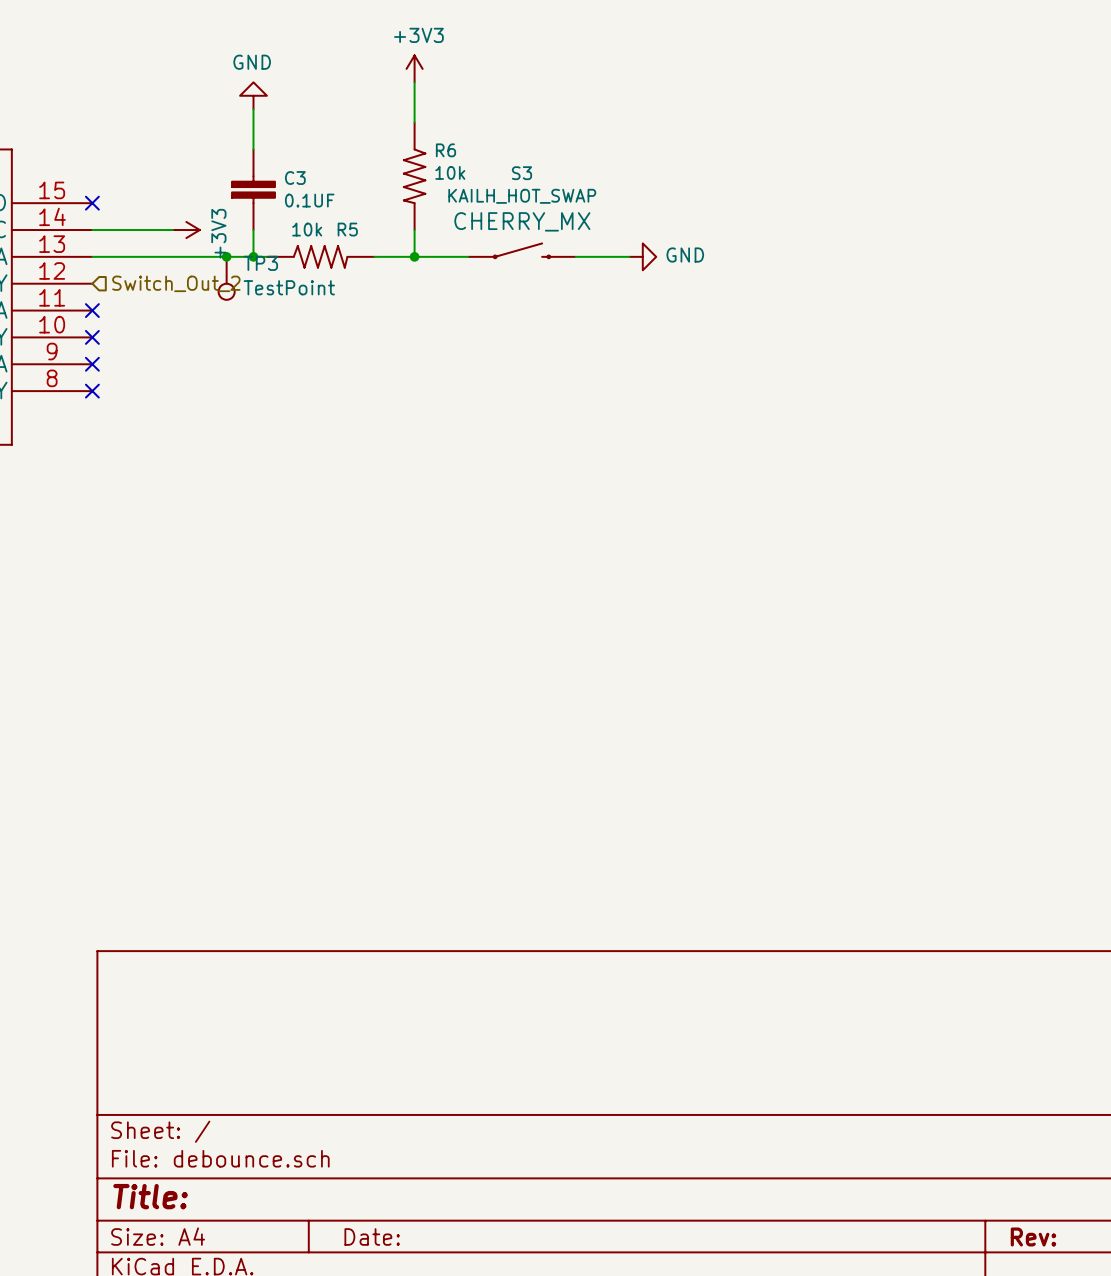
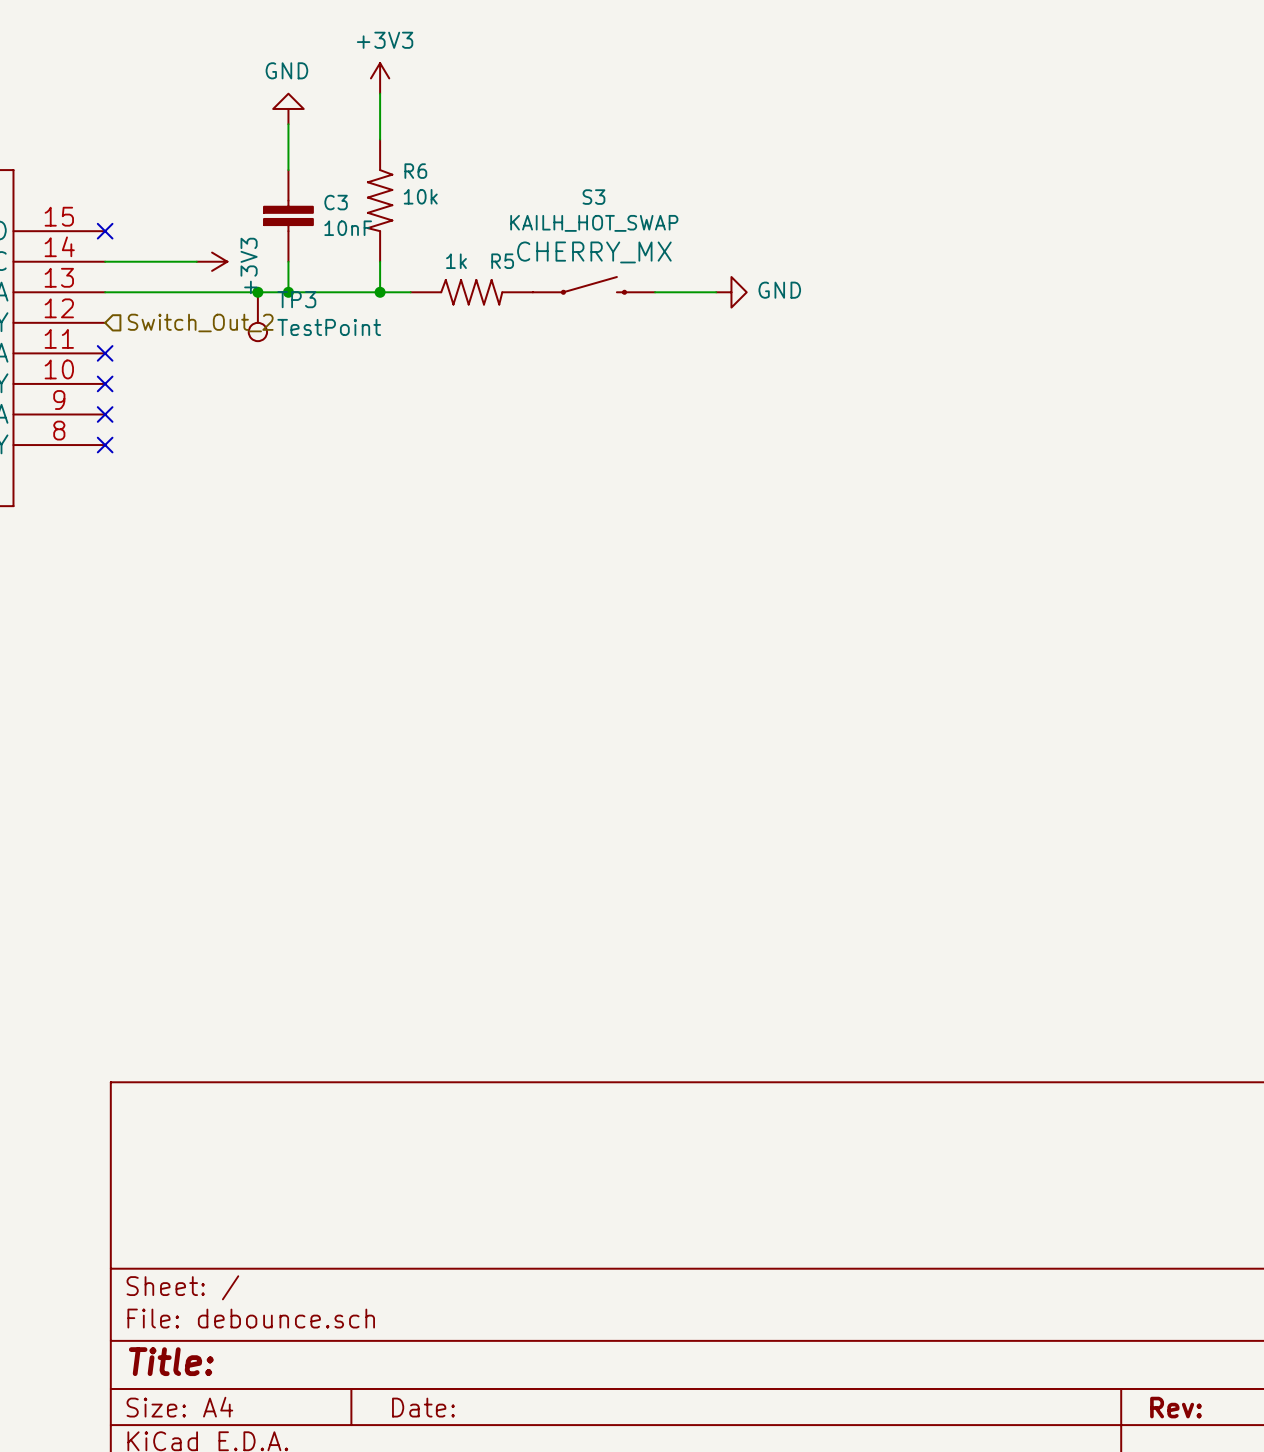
power symbol position: +3V3 (414, 68) -> +3V3 (380, 78)
wire: (414, 82) (414, 122) -> (380, 93) (380, 139)
R6 position: (414, 176) -> (380, 200)
C3 value: 0.1UF (309, 200) -> 10nF (348, 228)
R5 value: 10k (307, 229) -> 1k (456, 261)
wire: (414, 230) (414, 256) -> (380, 261) (380, 292)
R5 position: (320, 256) -> (471, 292)
junction: none -> (380, 292)
junction: (414, 256) -> none

